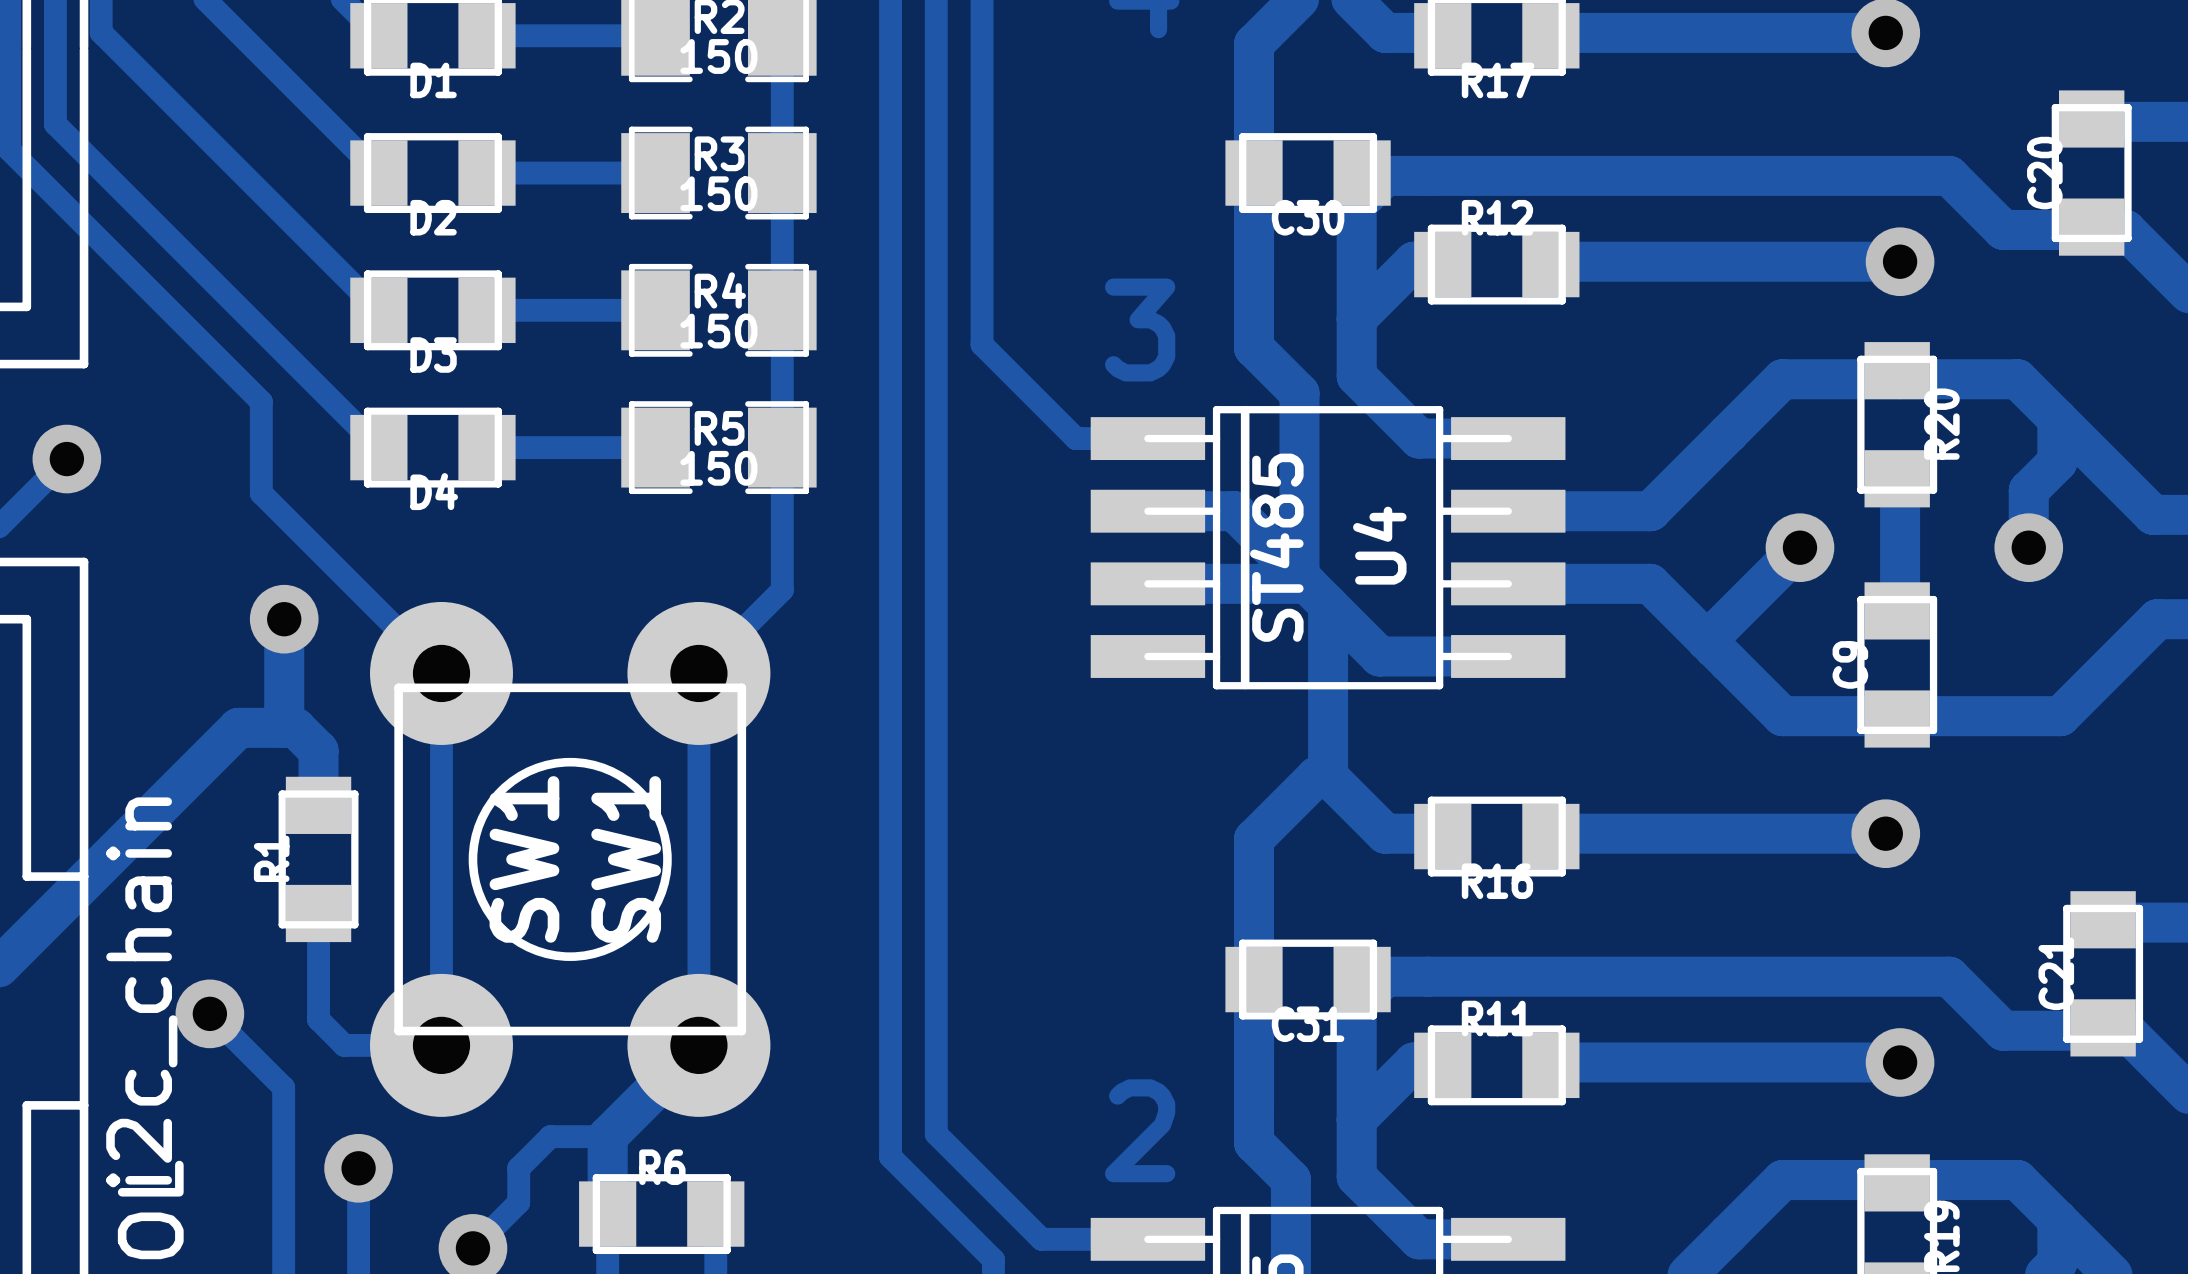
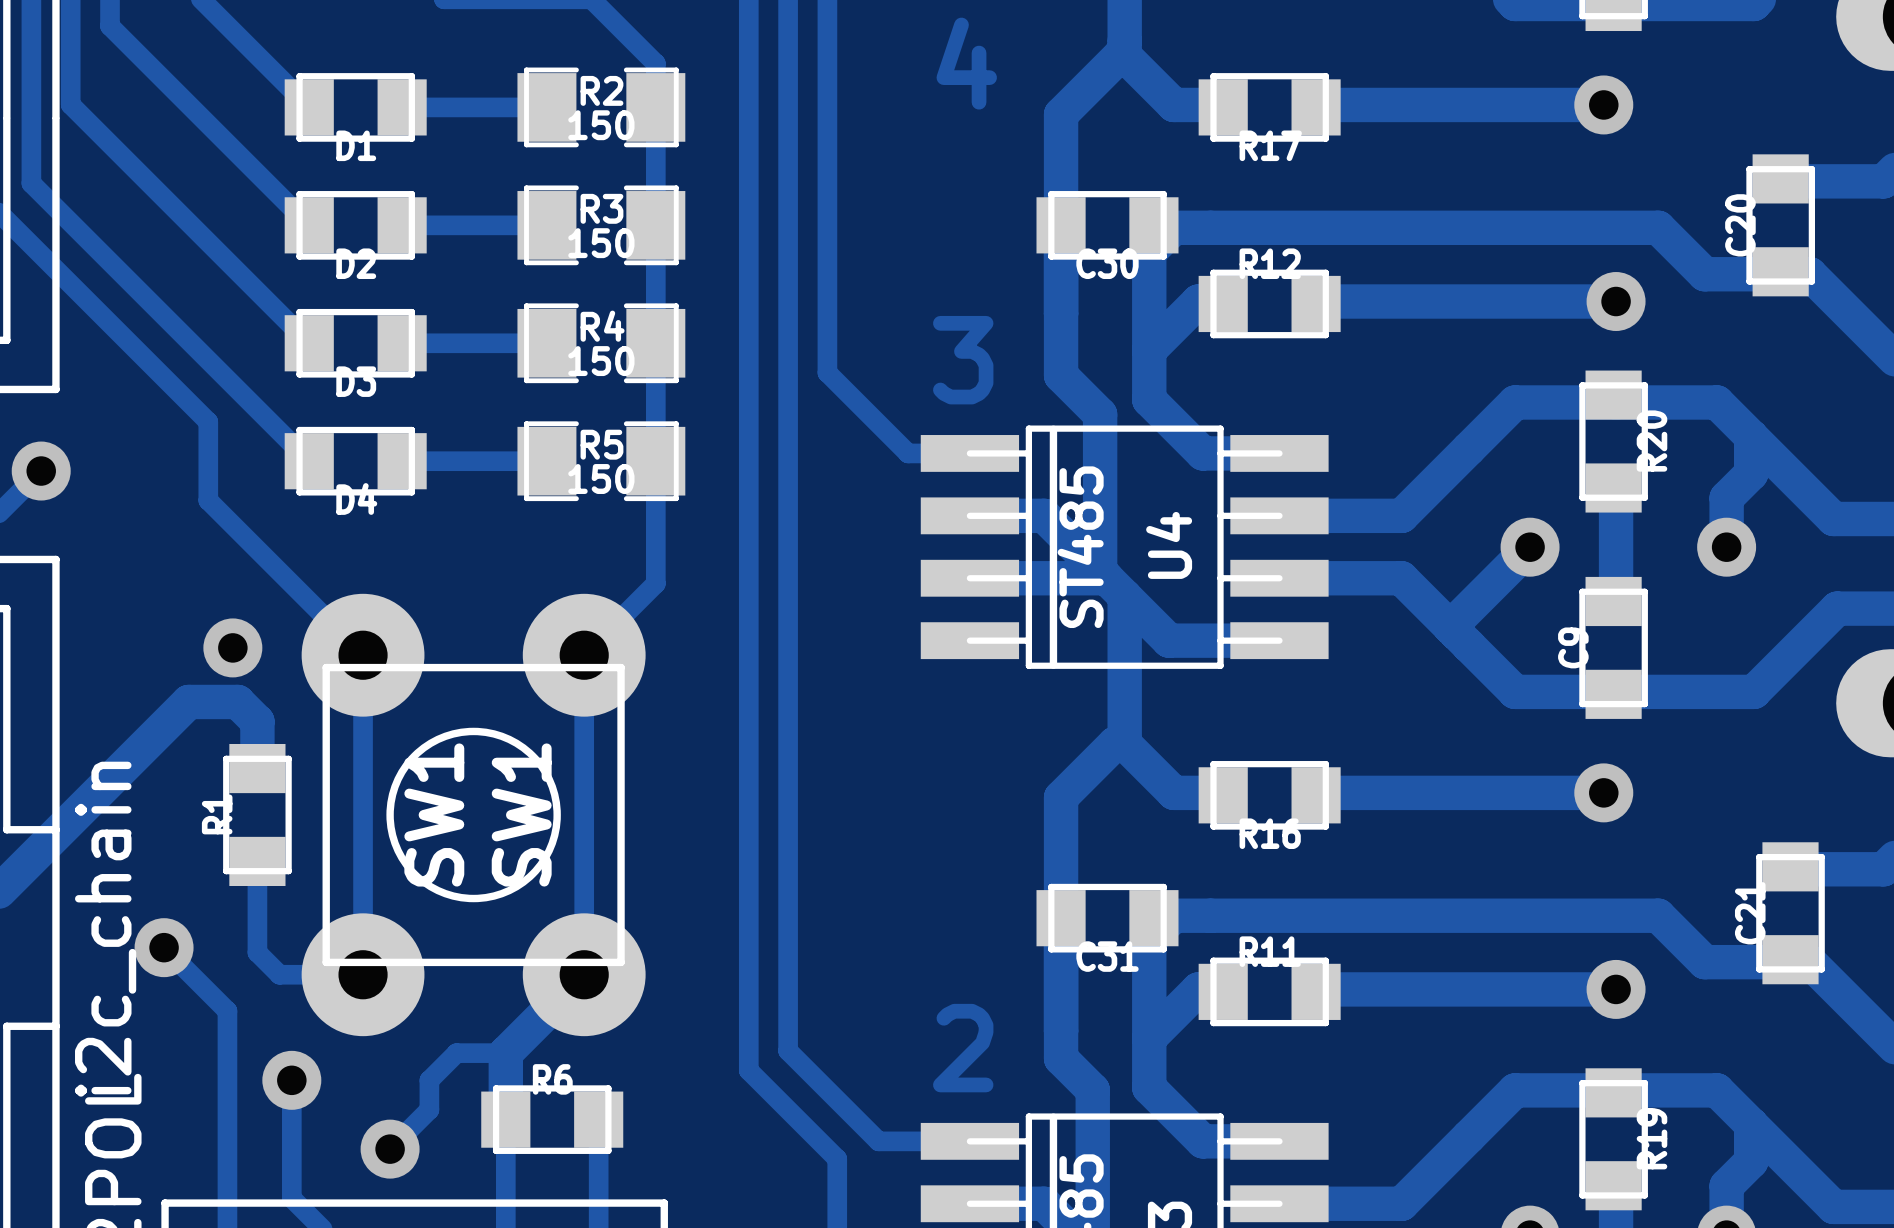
track: (284, 619) (284, 727) -> none
via position: (284, 619) -> (232, 647)

